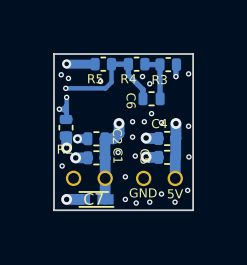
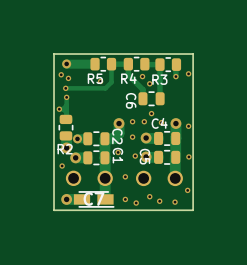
text: GND (143, 192) -> none
text: 5V (175, 193) -> none
via: (161, 194) -> none
via: none -> (149, 196)
via: none -> (159, 201)
via: (149, 202) -> none

